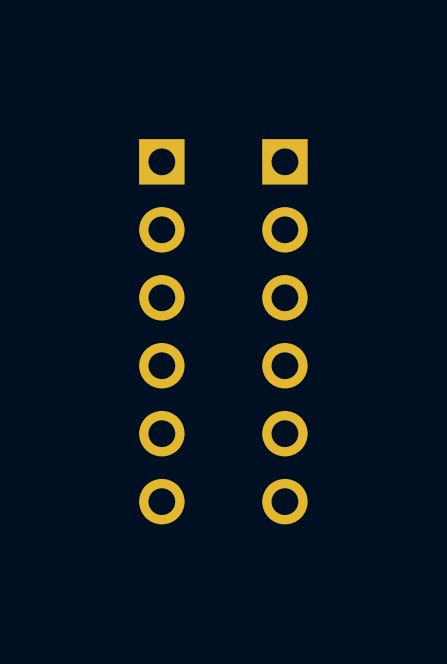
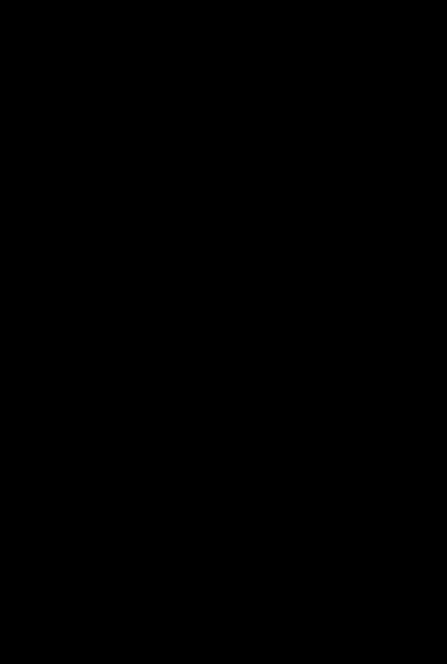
part: (161, 331) -> none
part: (284, 331) -> none

